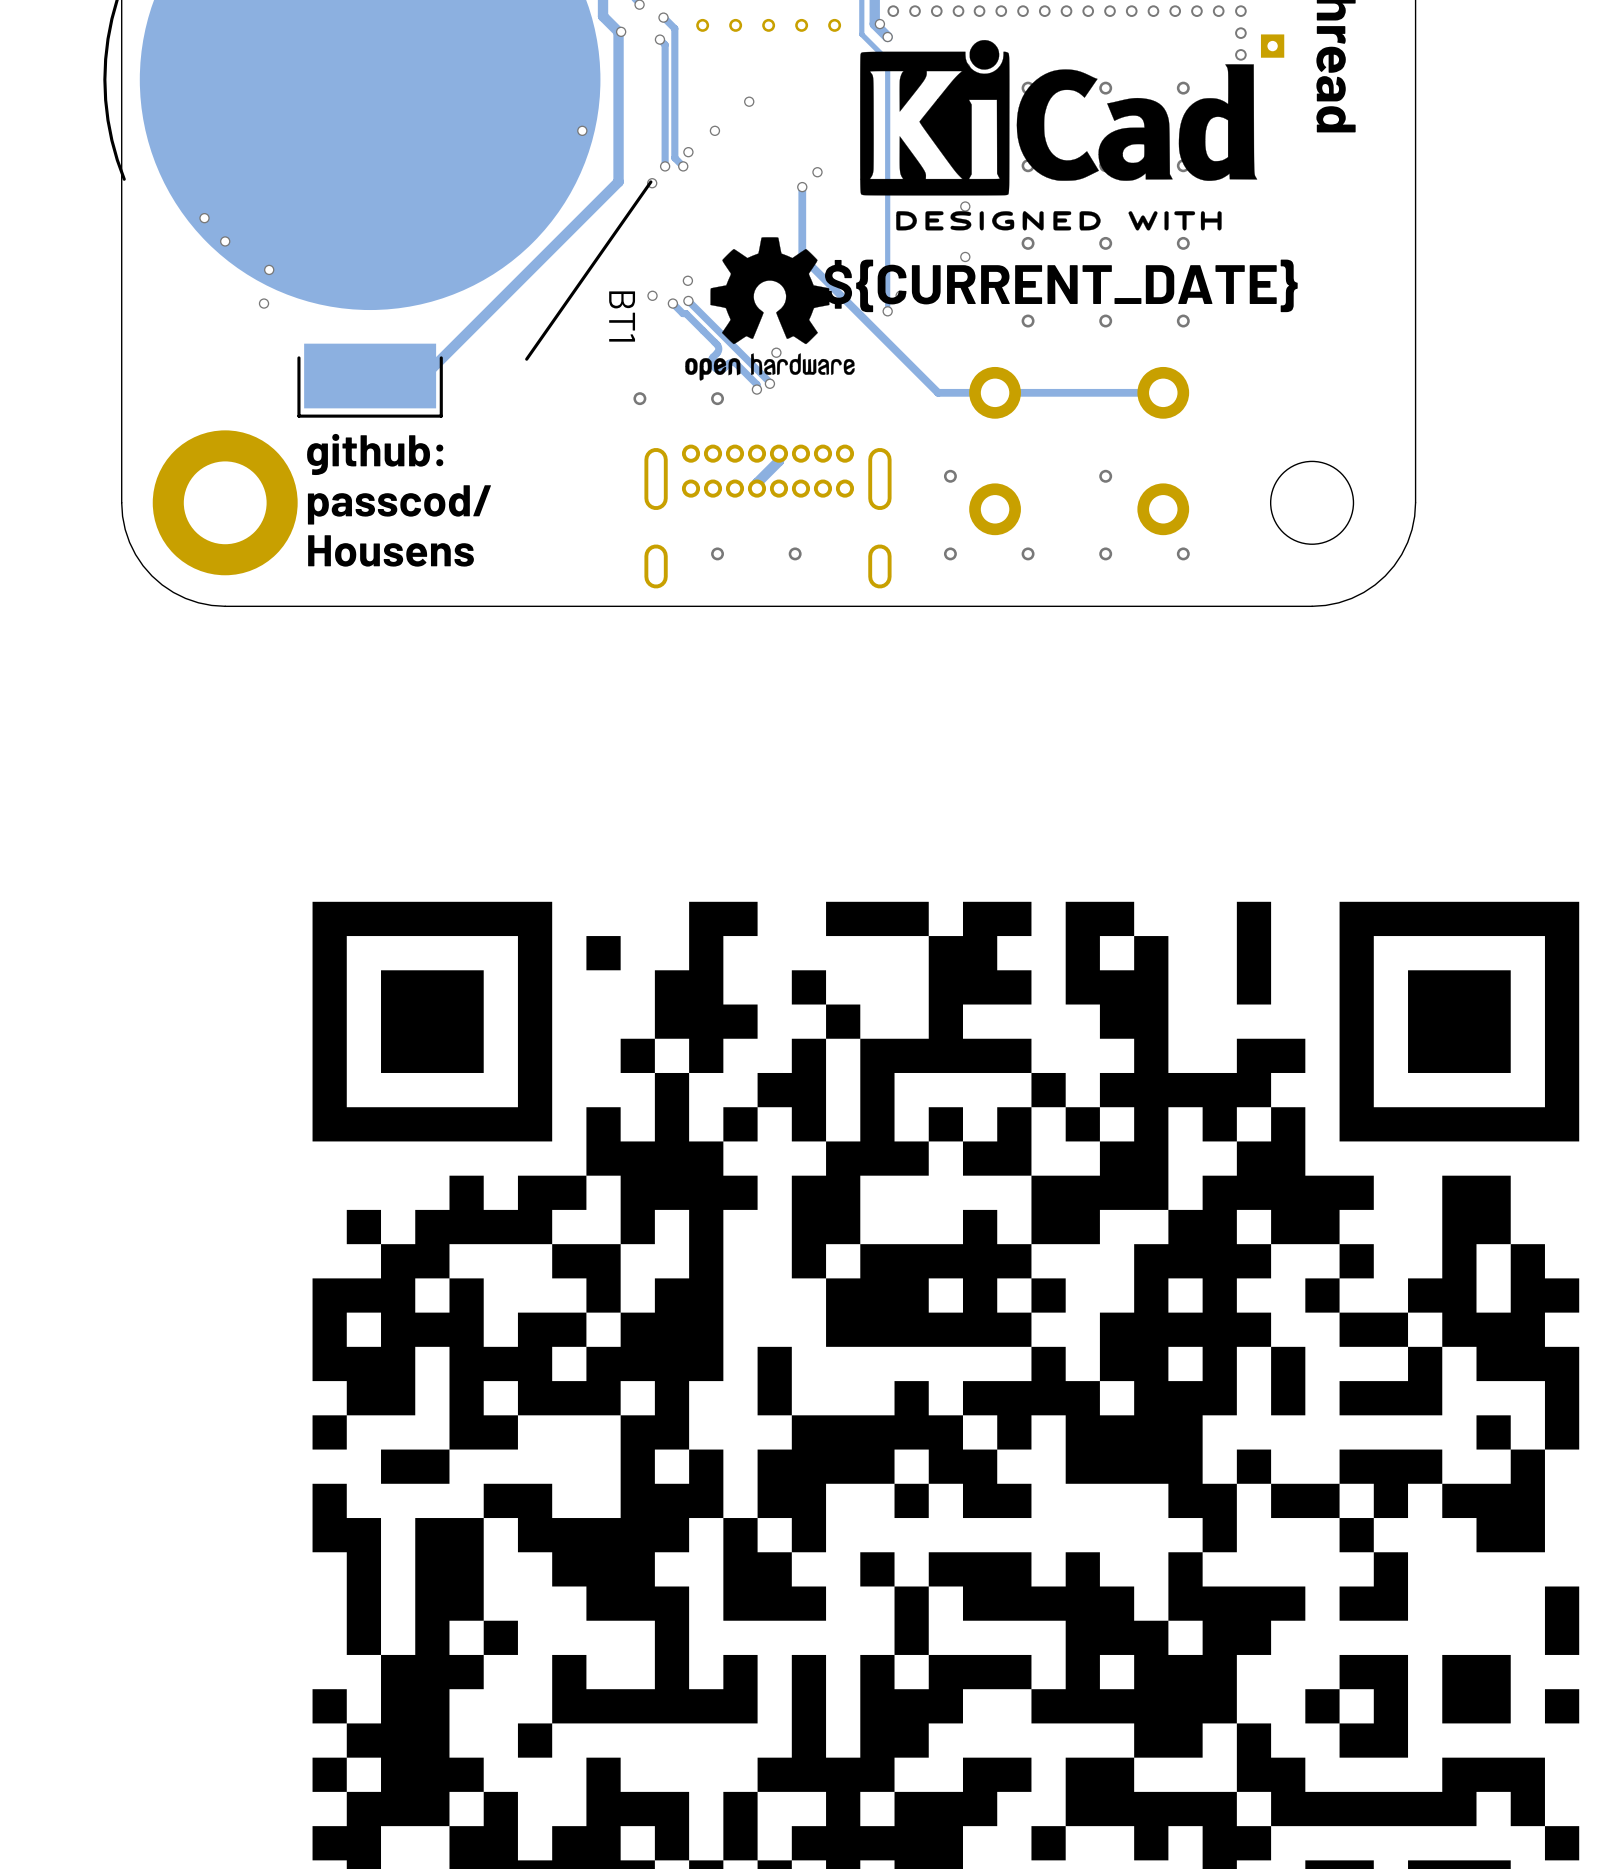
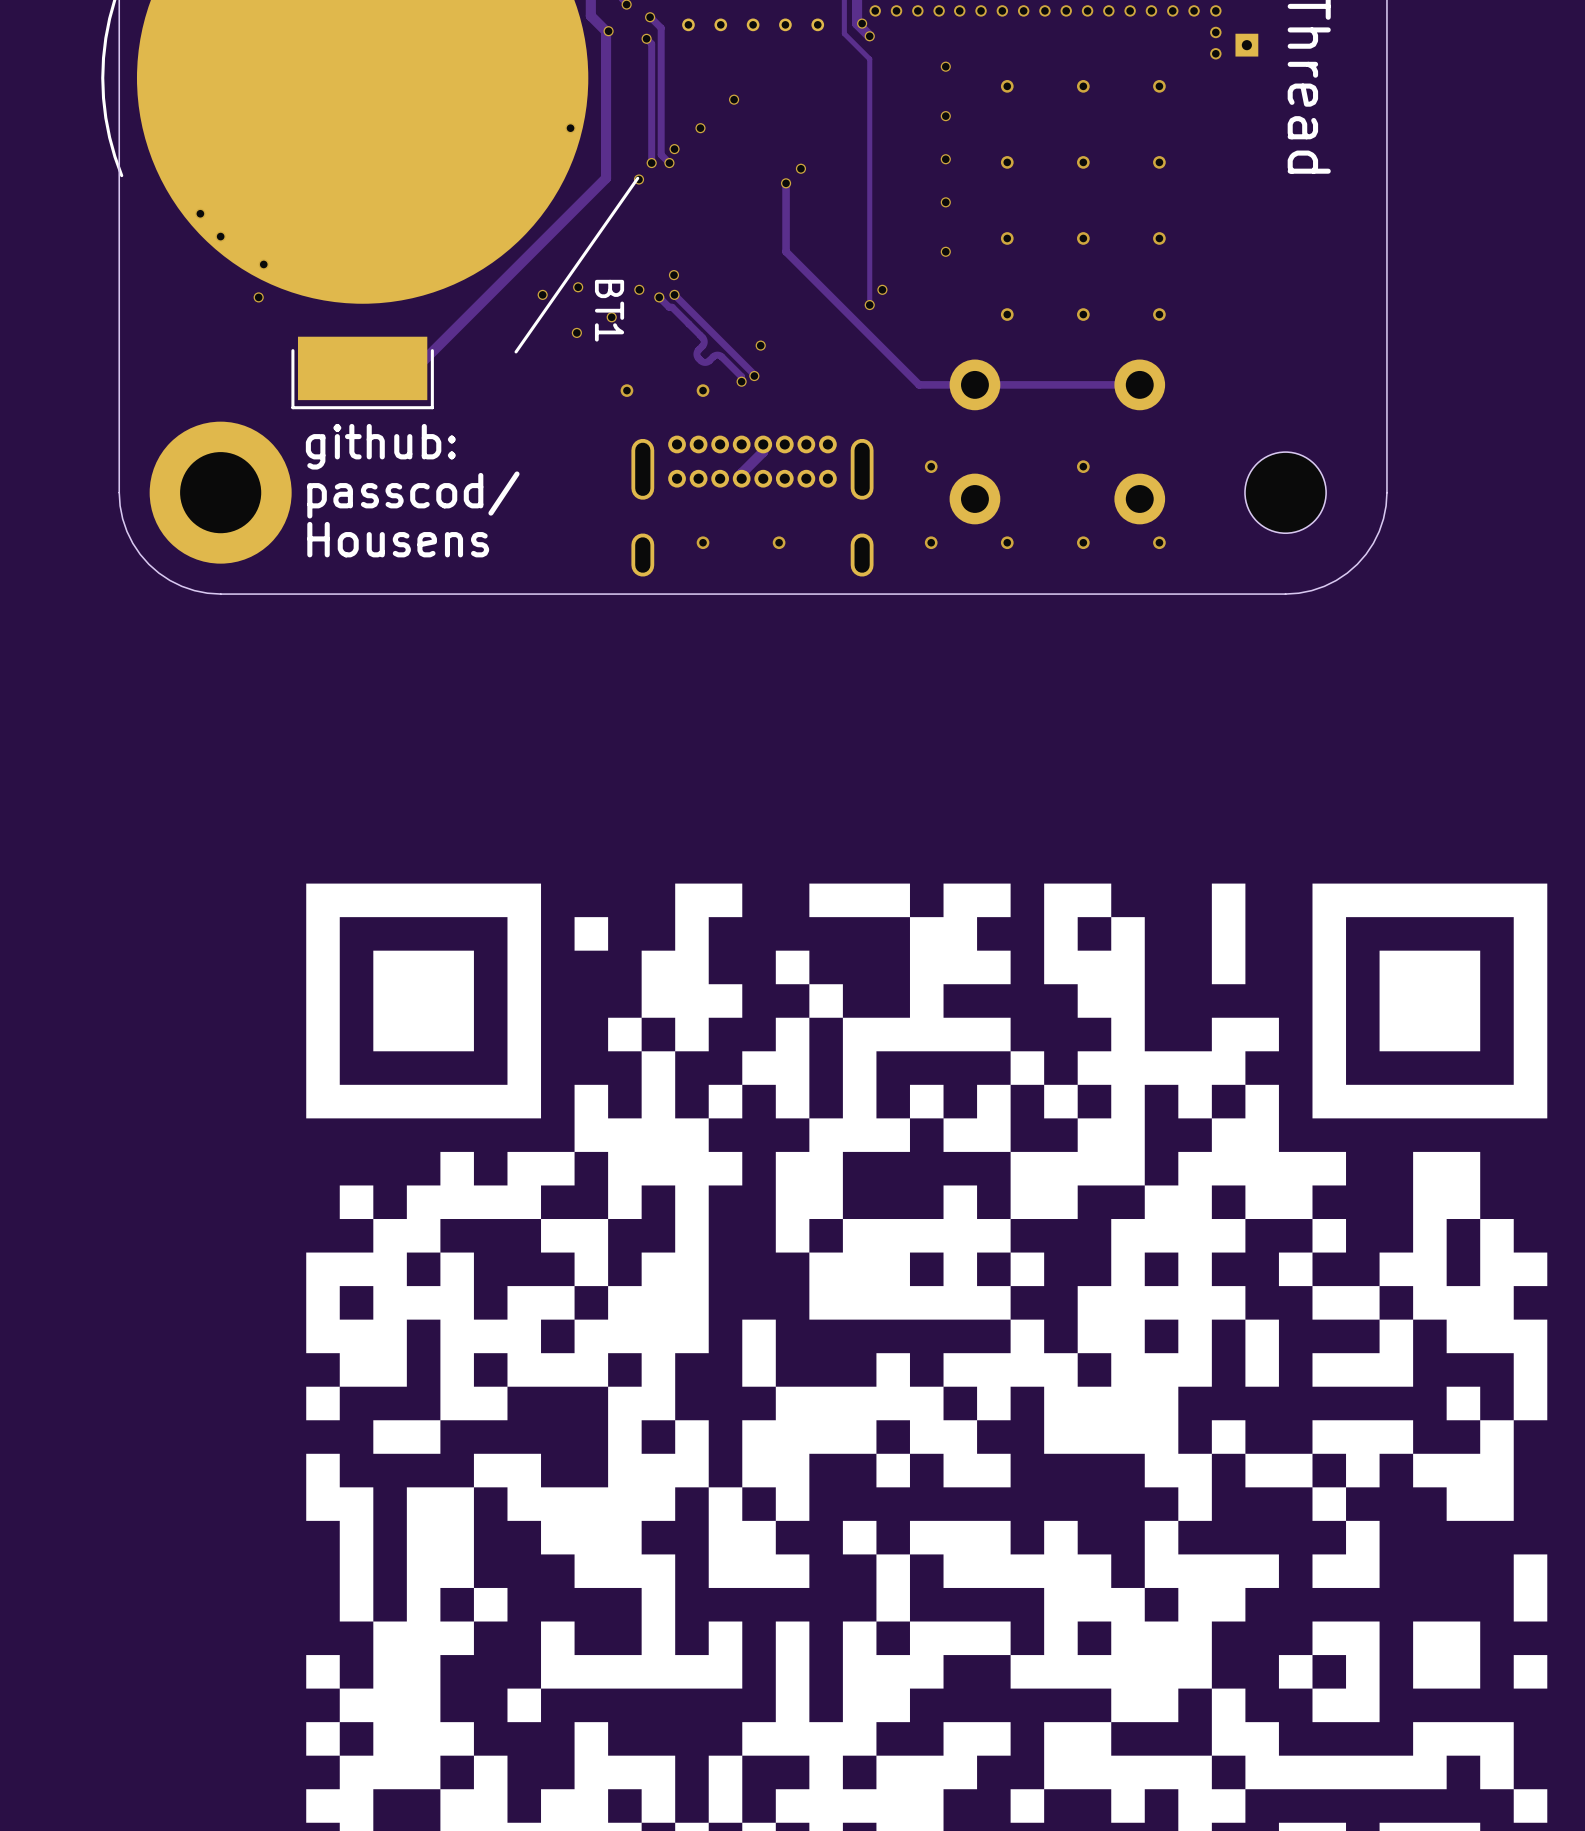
drawing: [685, 40, 1258, 381] -> none
text: ${CURRENT_DATE} (1061, 285) -> none
via: none -> (578, 287)
via: none -> (542, 294)
via: none -> (611, 317)
via: none -> (576, 332)

